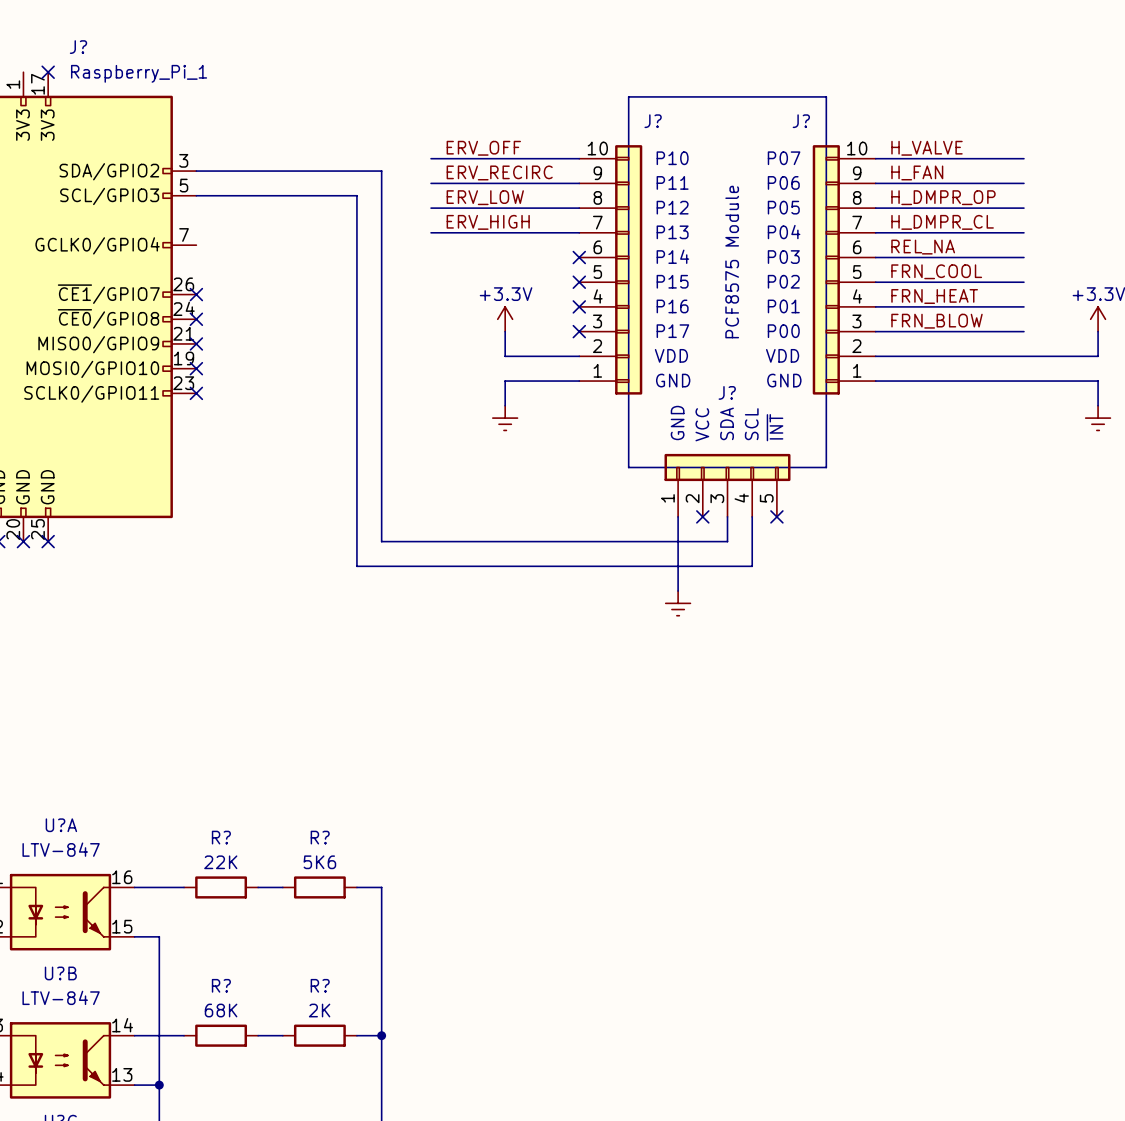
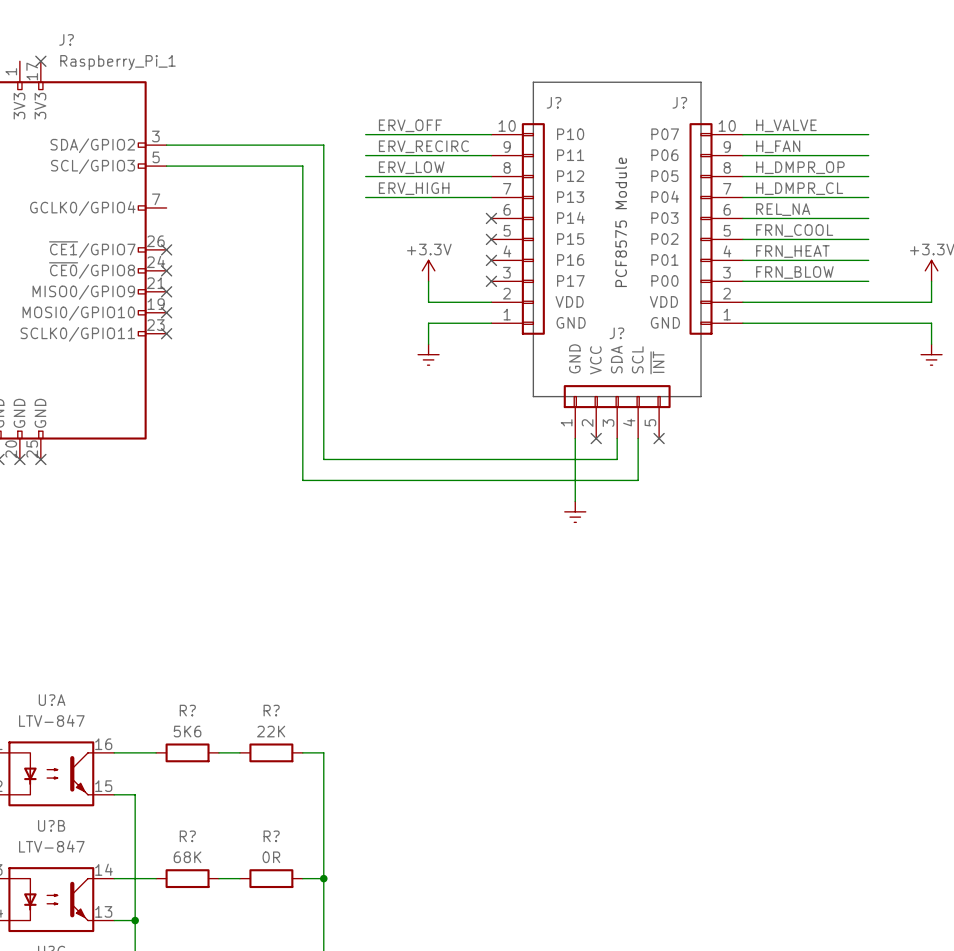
R? value: 22K (220, 862) -> 5K6 (187, 731)
R? value: 5K6 (319, 862) -> 22K (271, 731)
R? value: 2K (319, 1010) -> 0R (271, 857)

